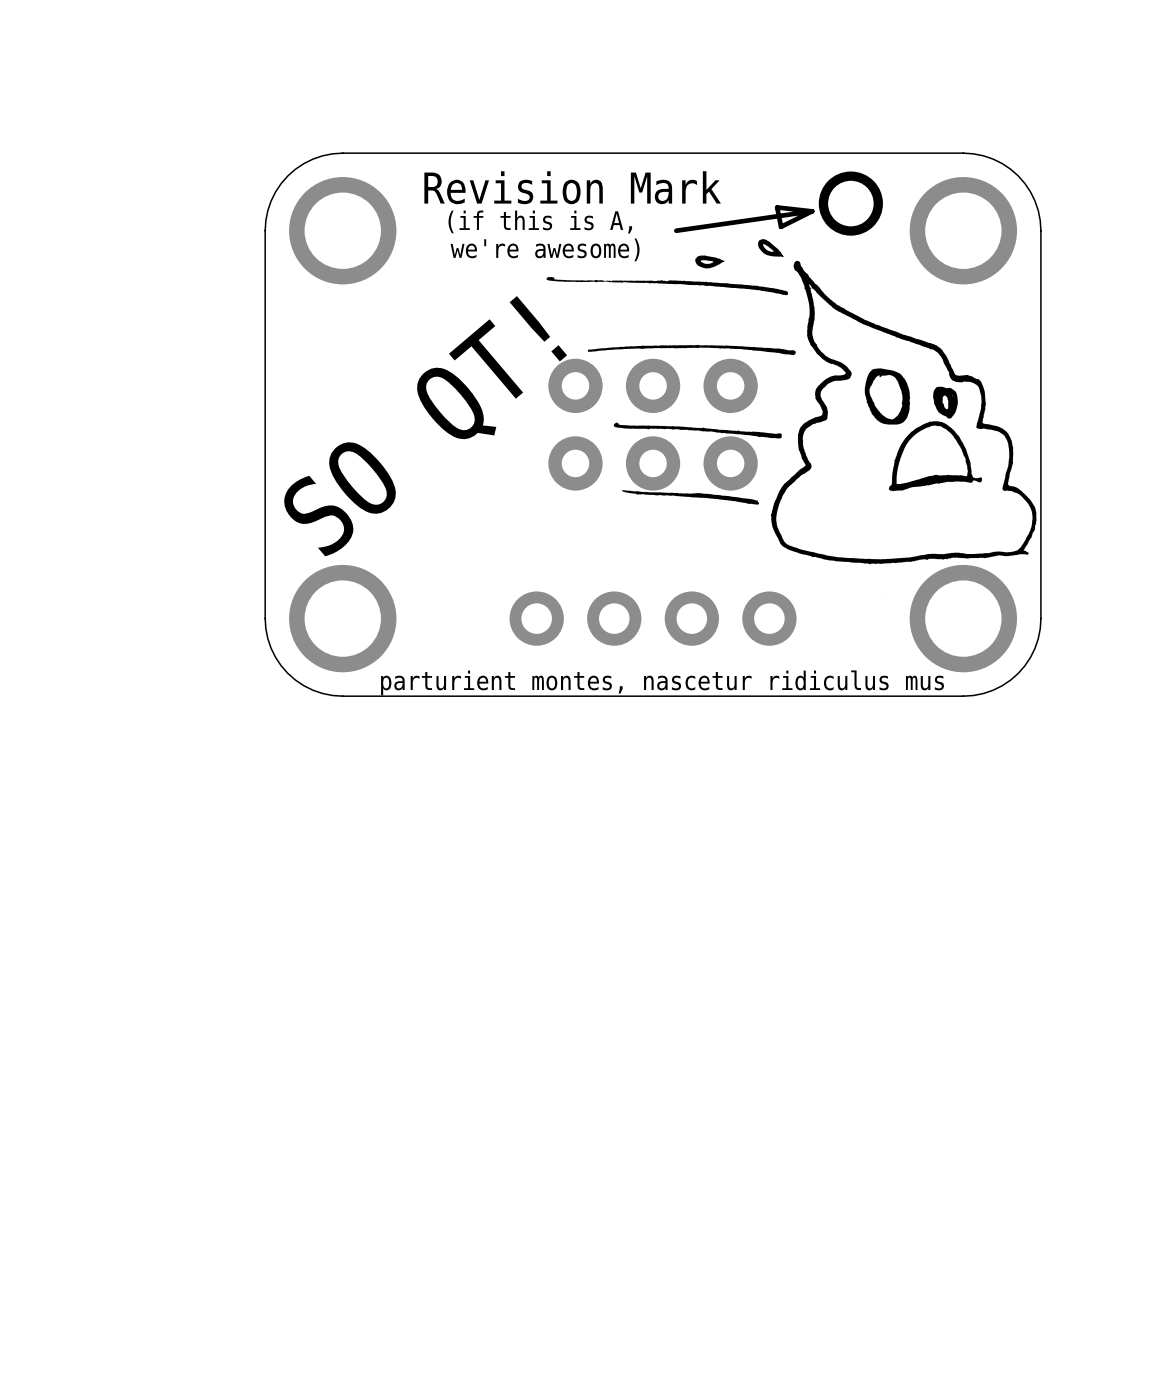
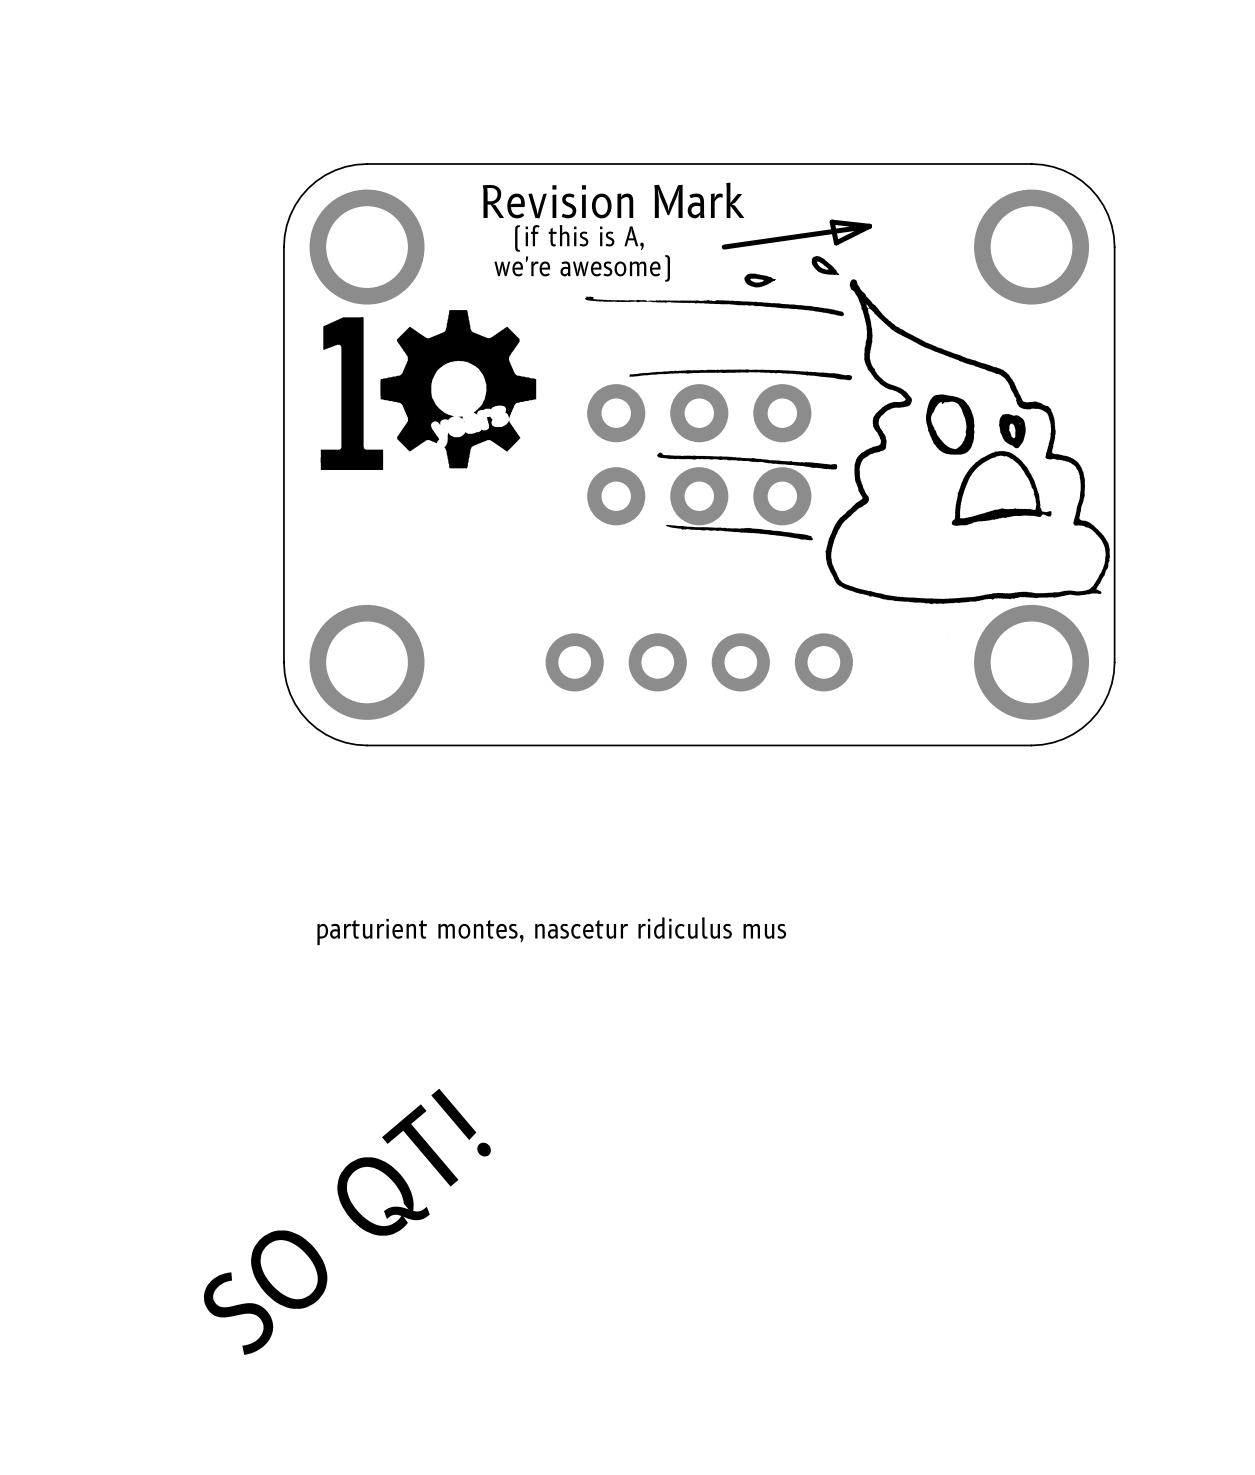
drawing: [818, 171, 883, 236] -> none
drawing: none -> [320, 310, 537, 470]
text position: SO QT! (425, 426) -> SO QT! (347, 1221)
text position: parturient montes, nascetur ridiculus mus (662, 682) -> parturient montes, nascetur ridiculus mus (551, 931)

